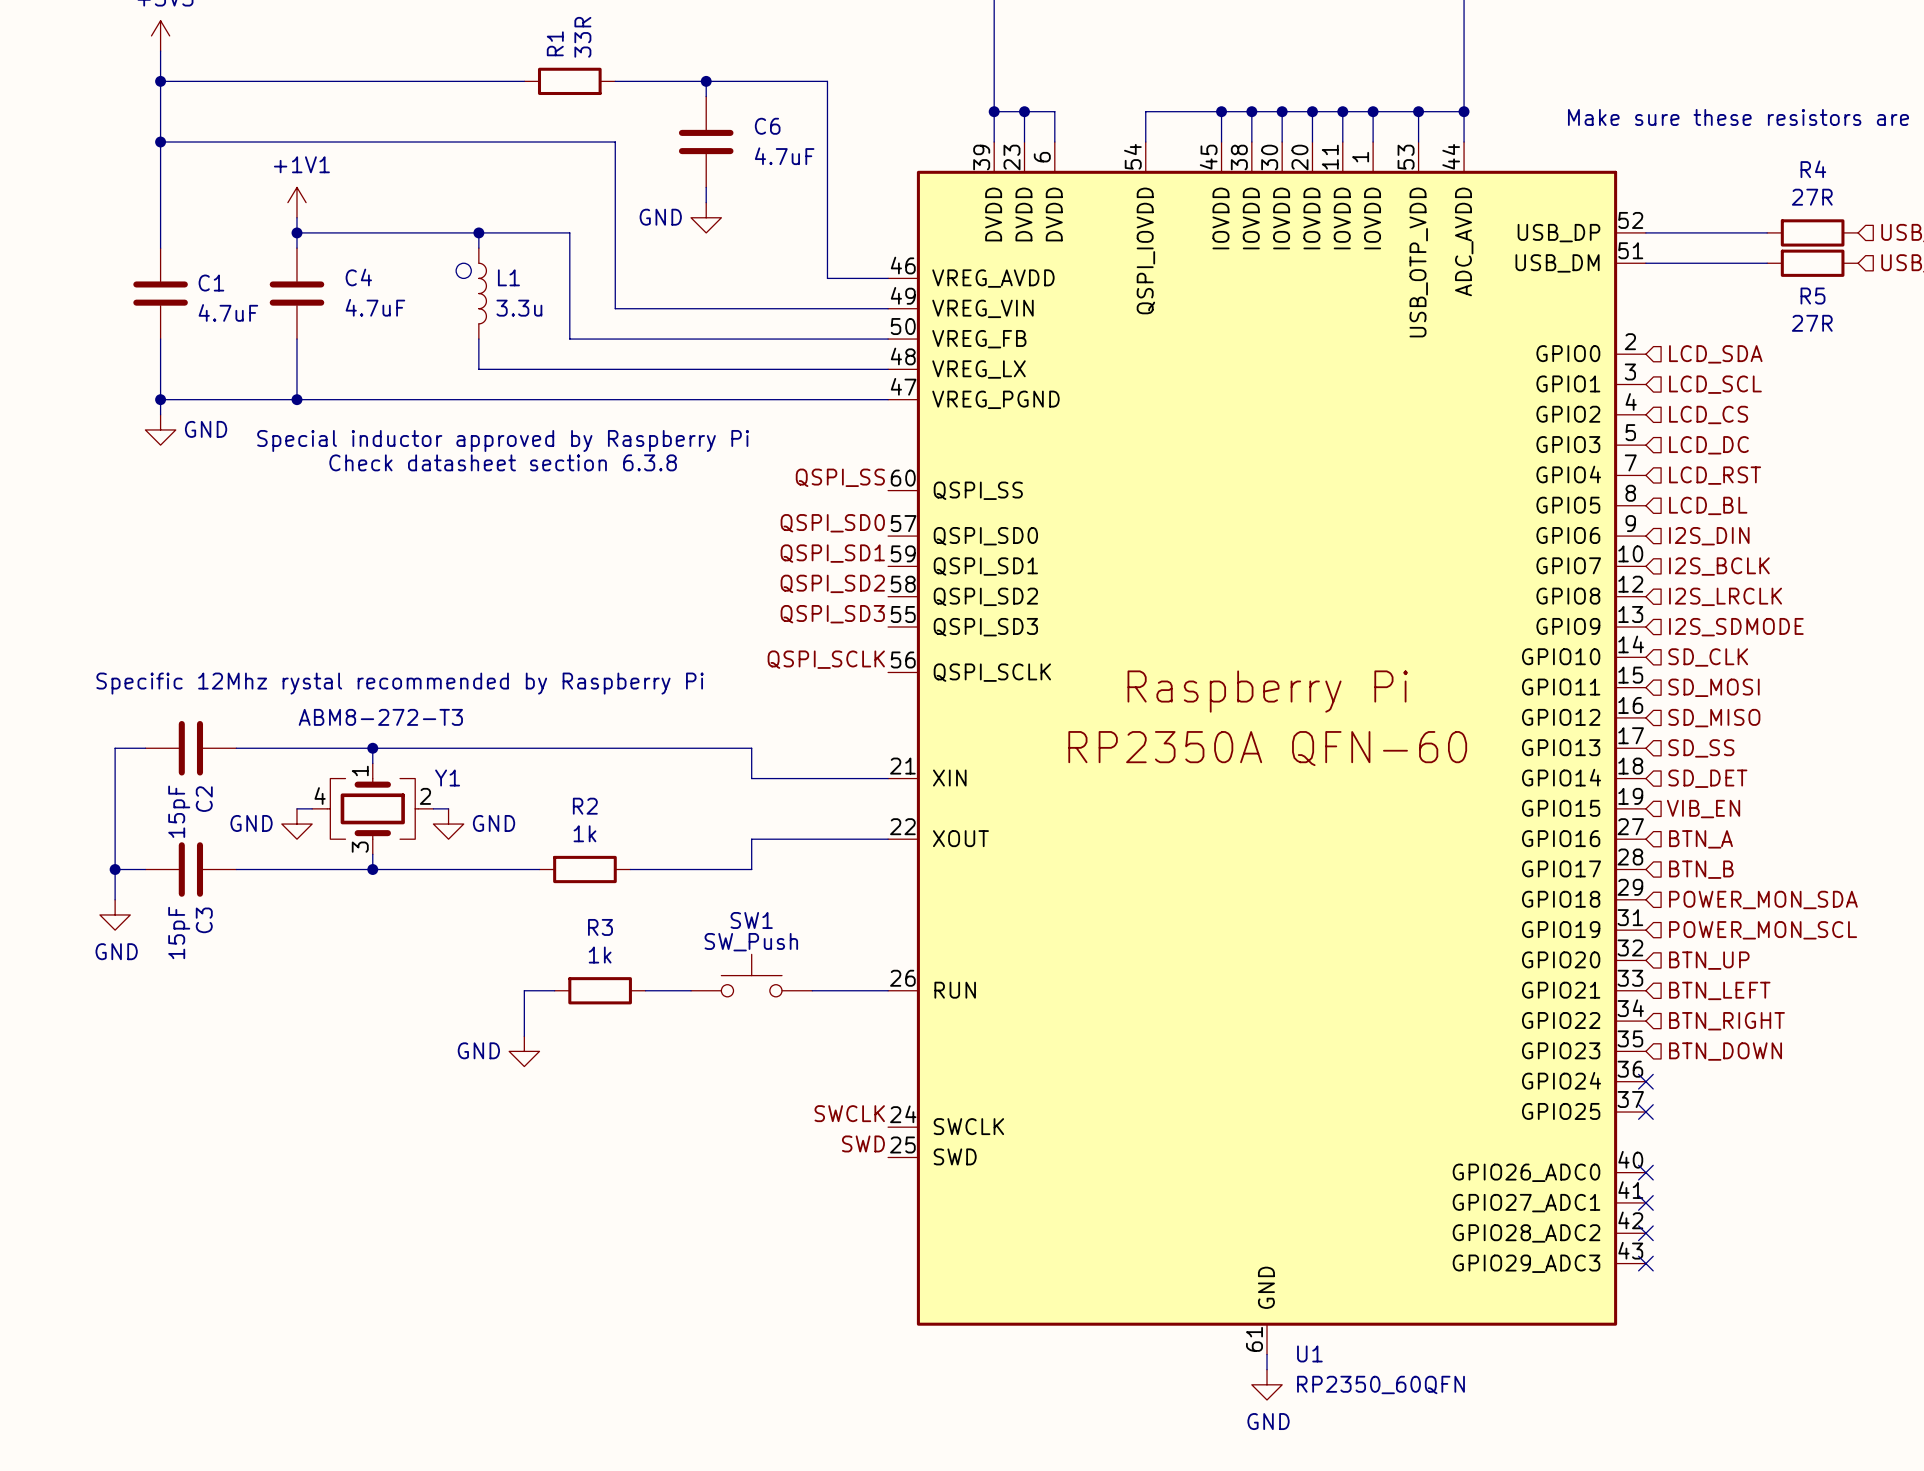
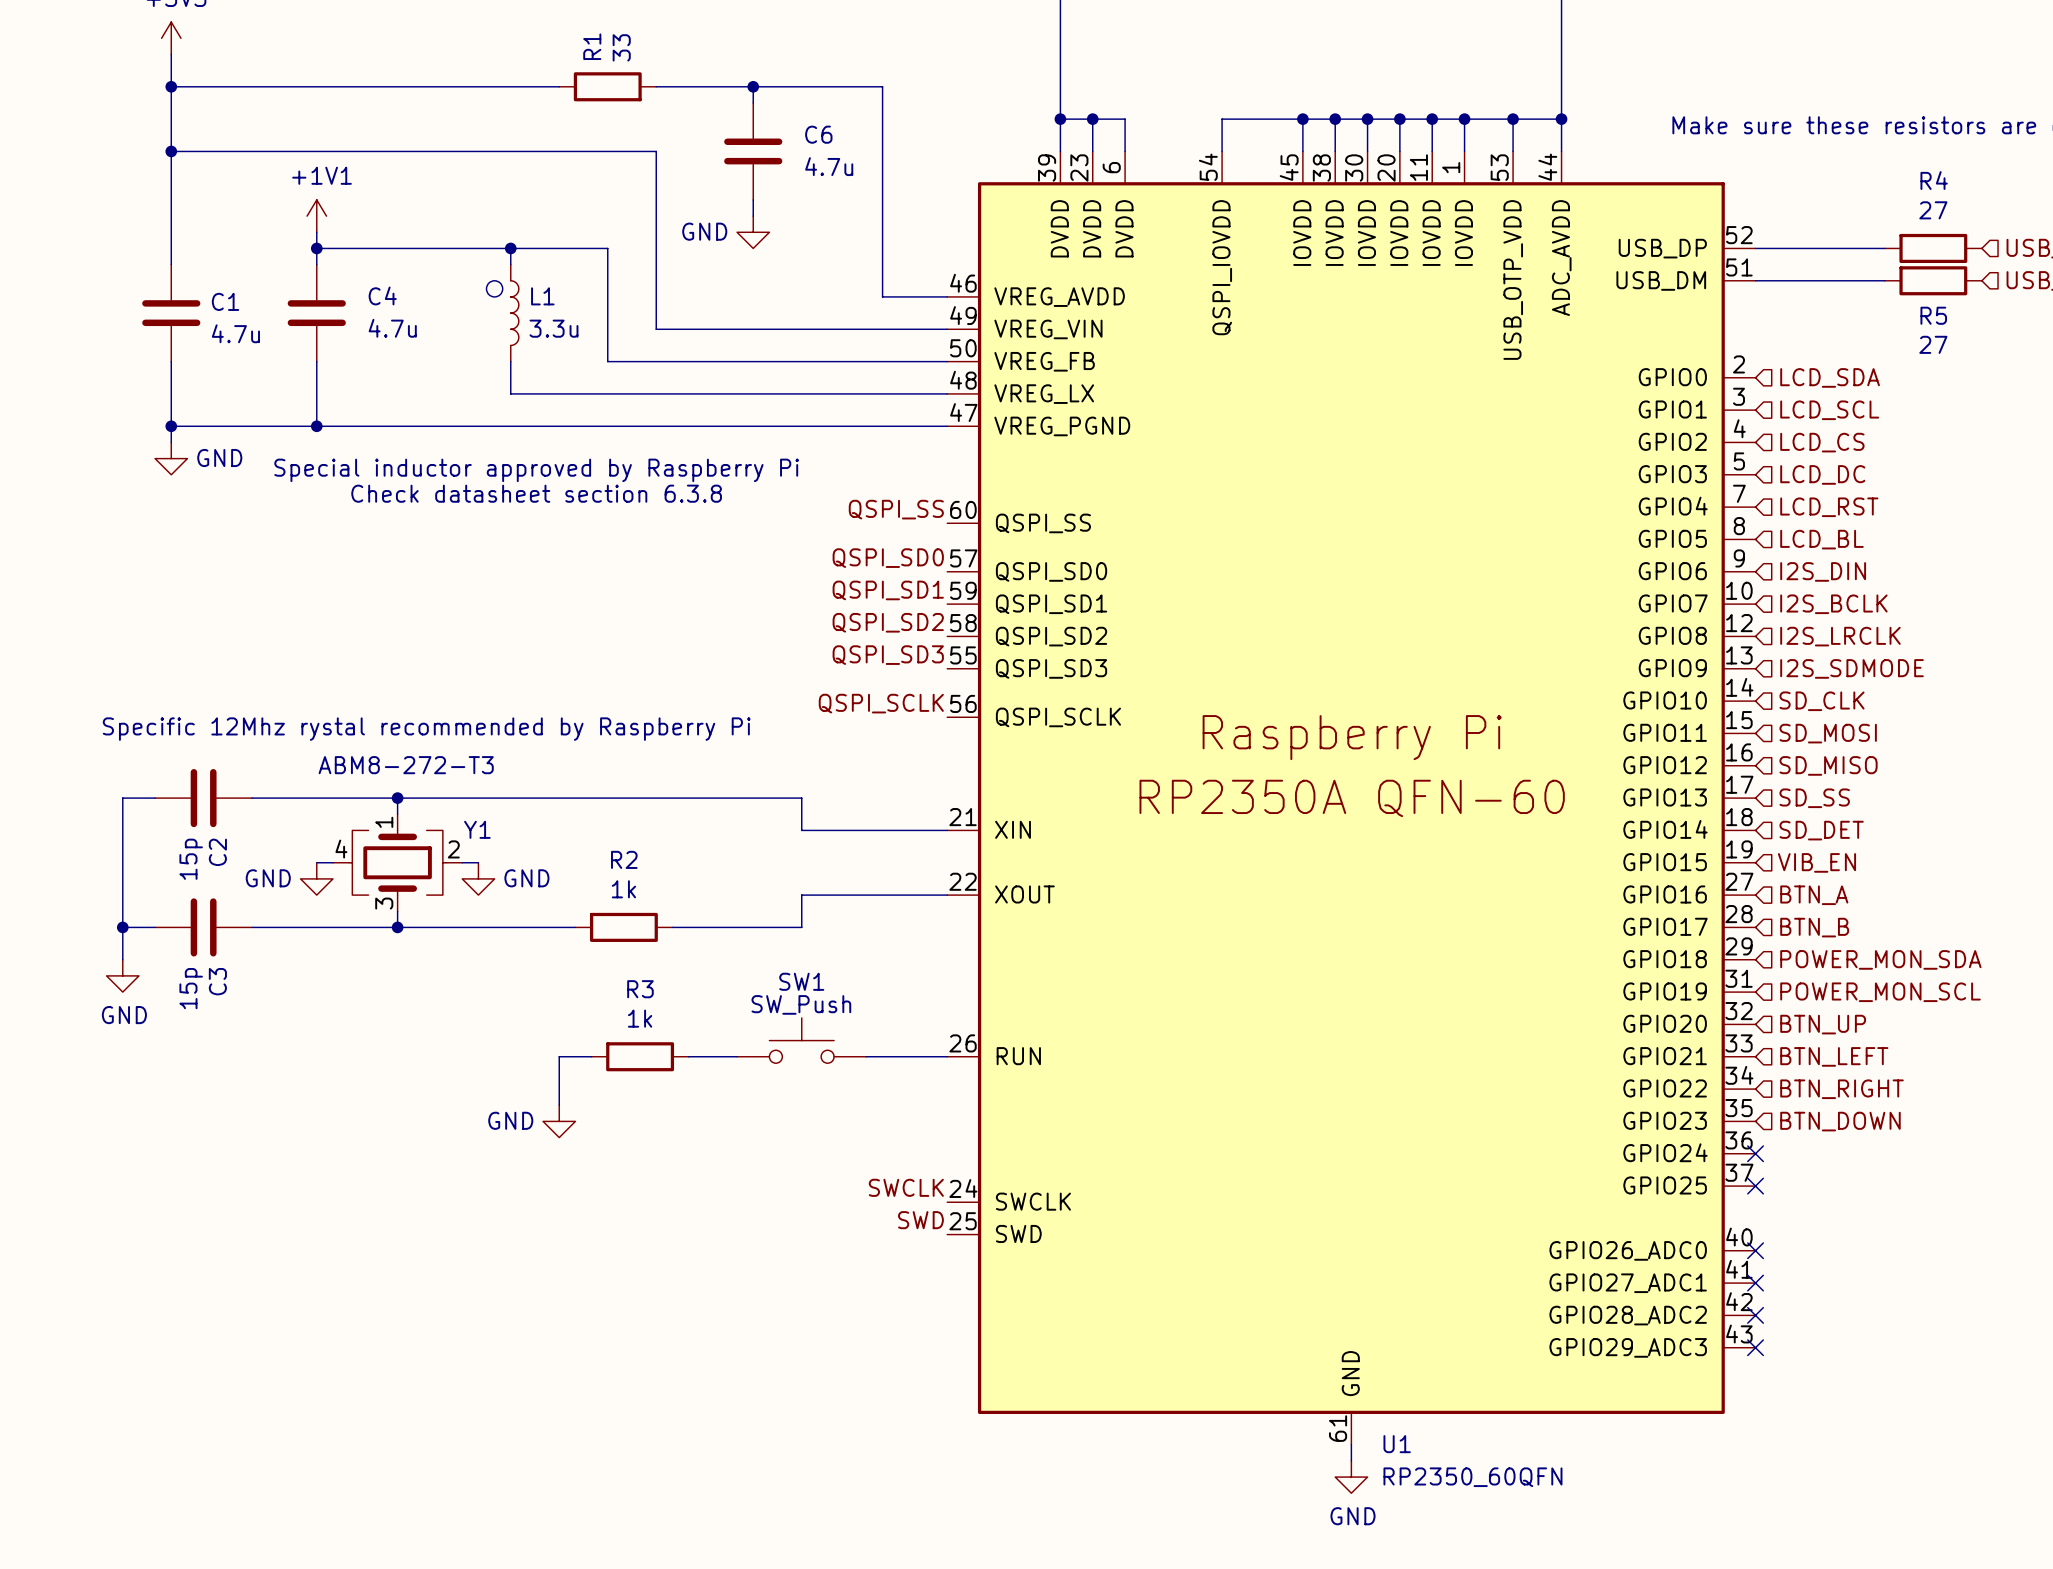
R1 value: 33R (582, 37) -> 33 (621, 47)
C6 value: 4.7uF (784, 156) -> 4.7u (829, 166)
R4 value: 27R (1812, 197) -> 27 (1933, 210)
C4 value: 4.7uF (375, 307) -> 4.7u (392, 328)
C1 value: 4.7uF (228, 312) -> 4.7u (235, 333)
R5 value: 27R (1812, 323) -> 27 (1933, 344)
C2 value: 15pF (179, 811) -> 15p (191, 859)
C3 value: 15pF (179, 932) -> 15p (191, 988)

